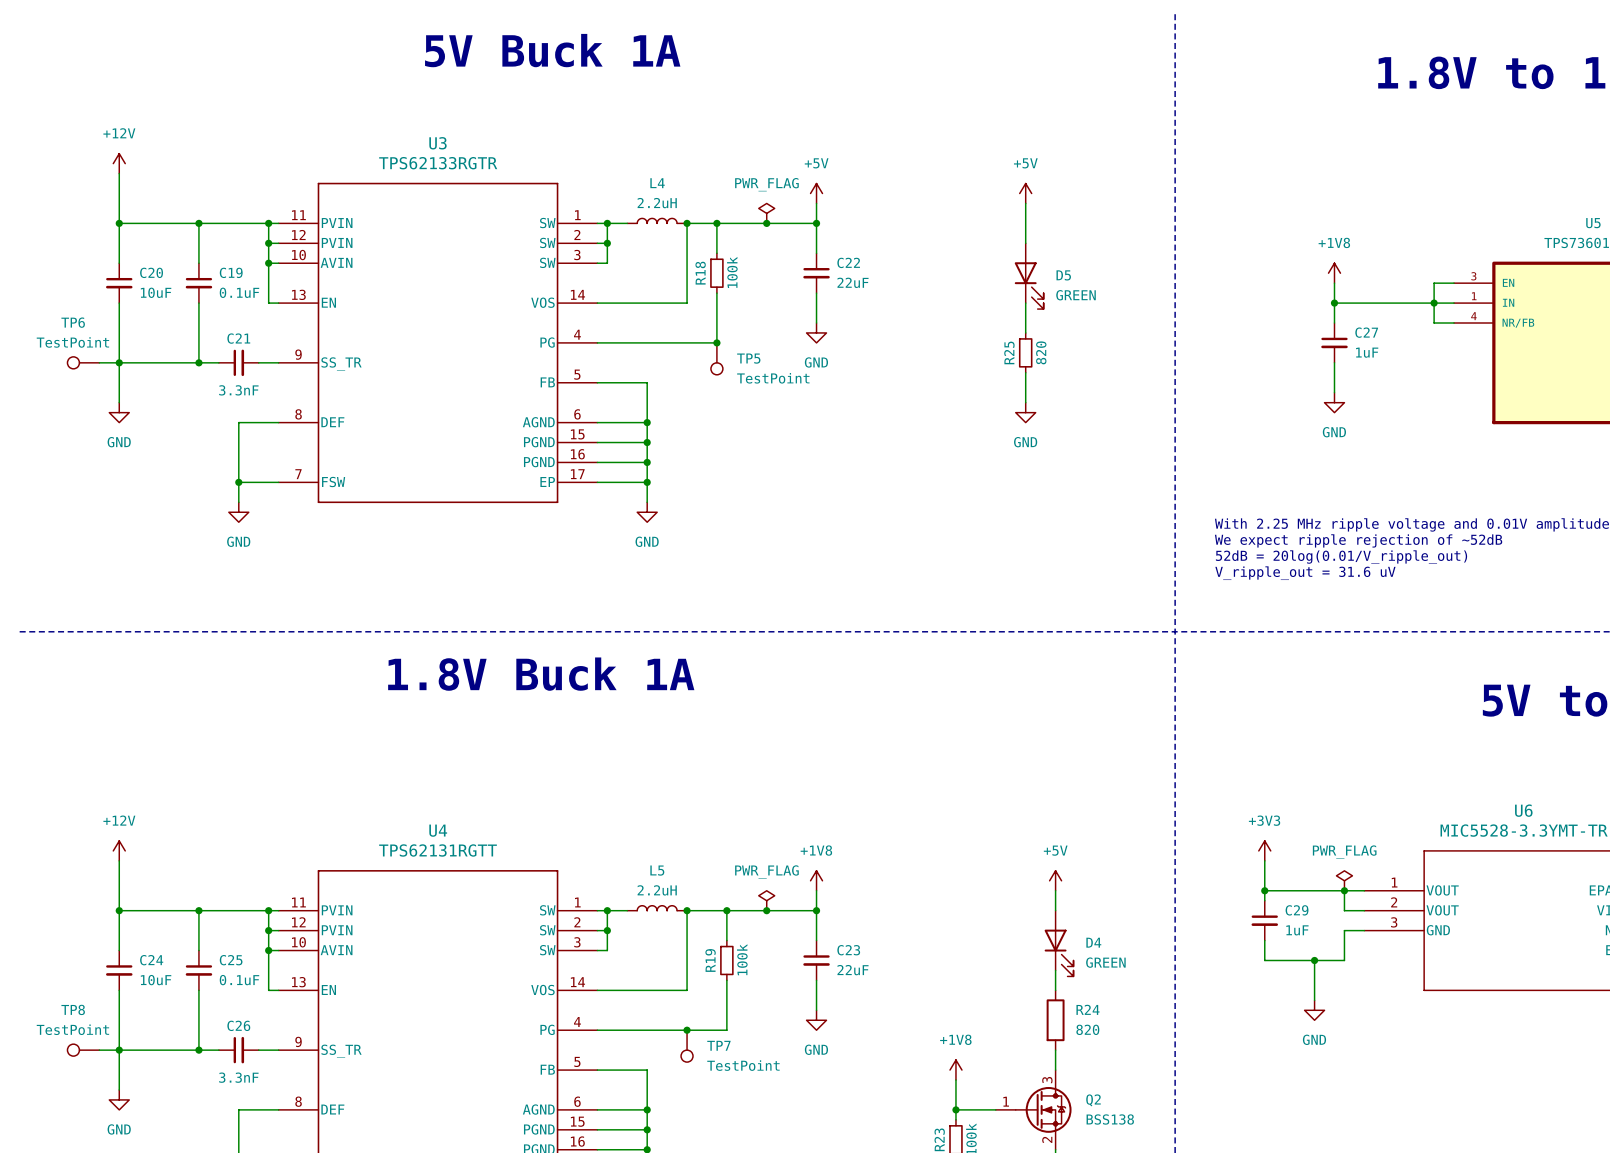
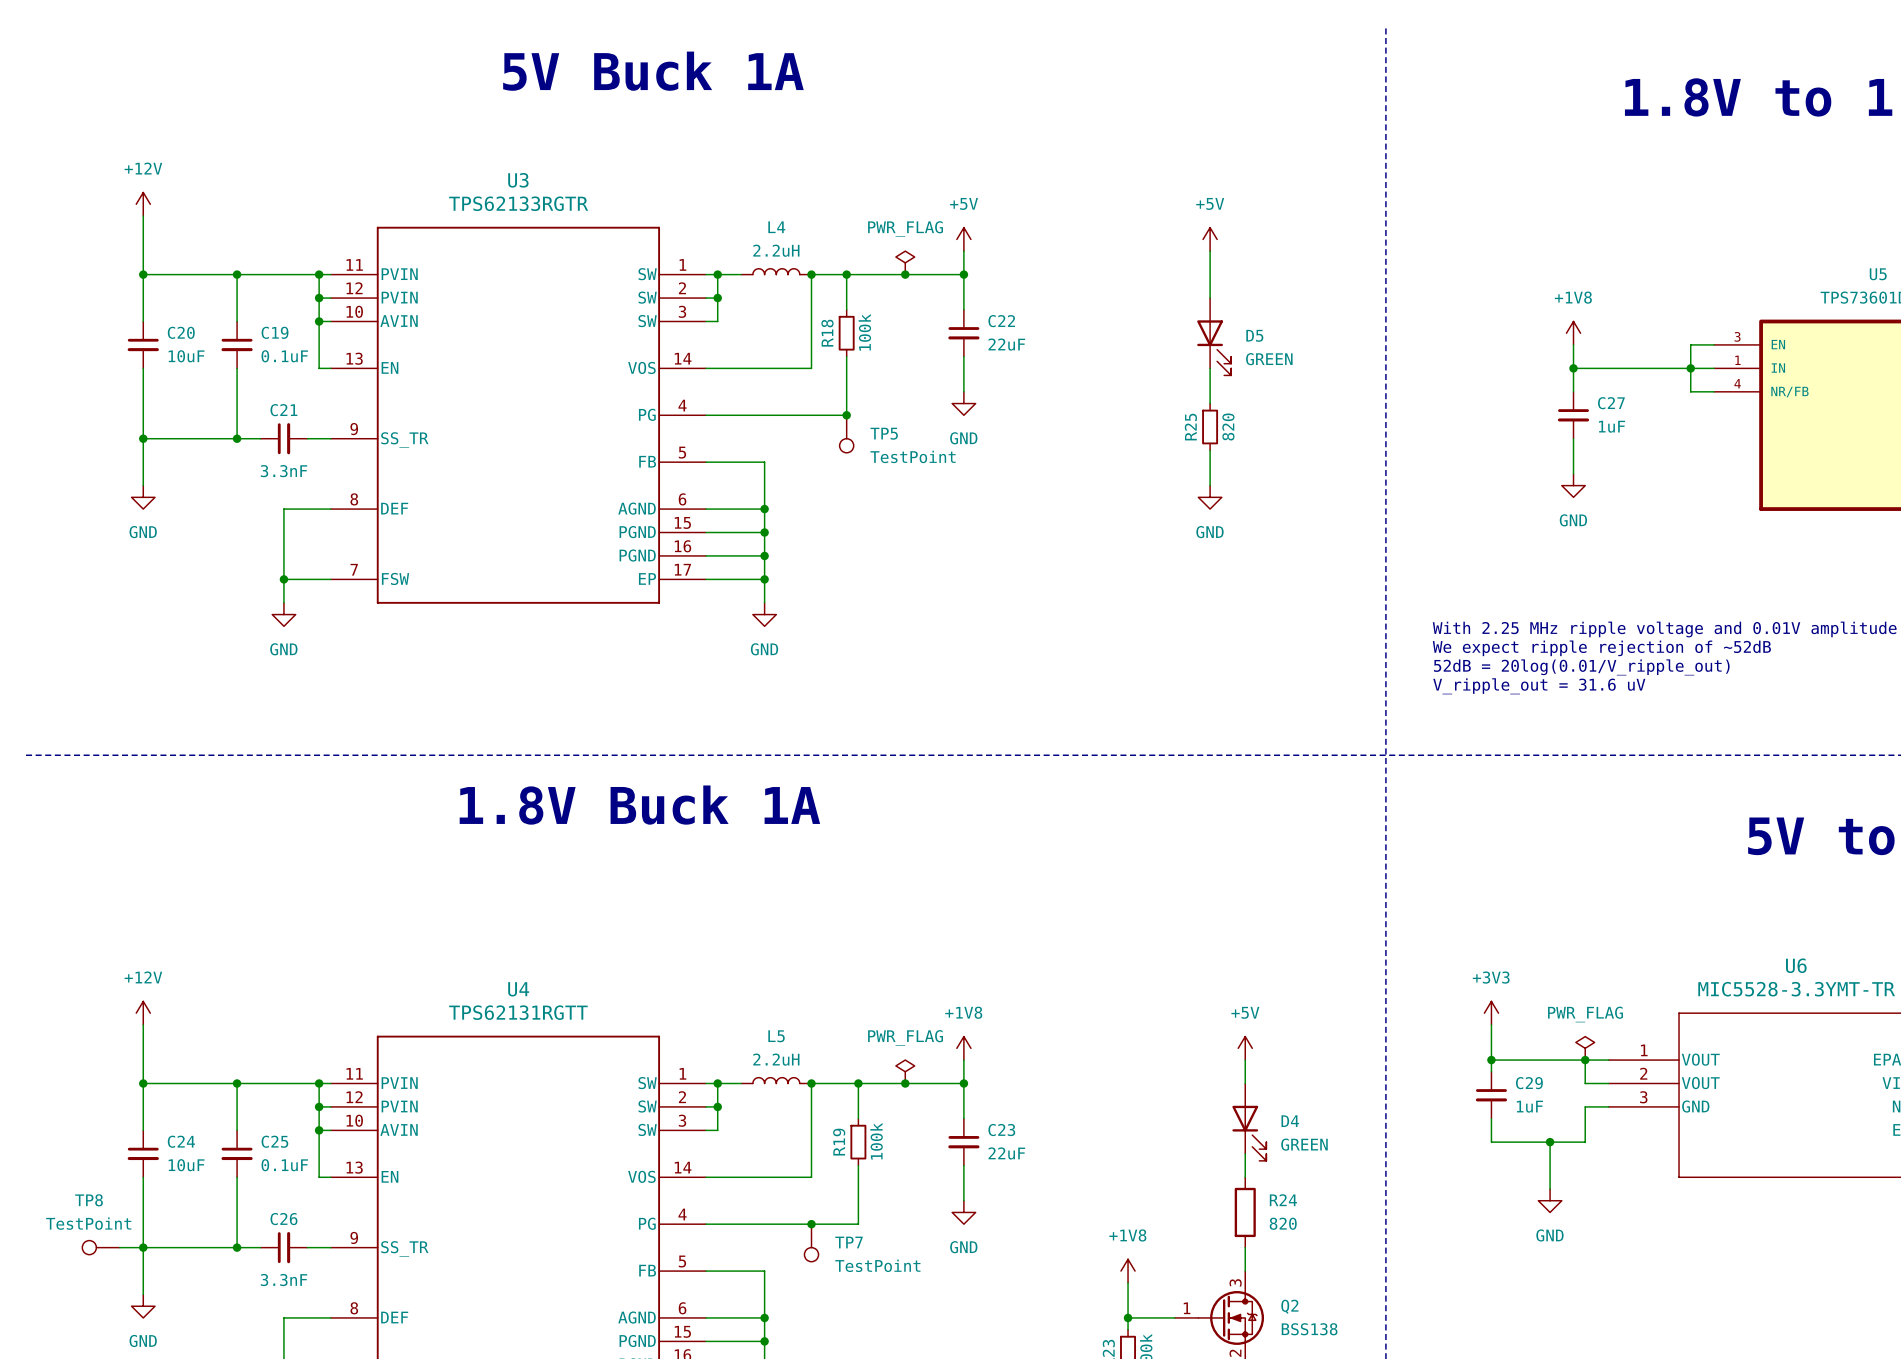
TP6: TestPoint (83, 362) -> none
wire: (99, 362) (119, 362) -> none

